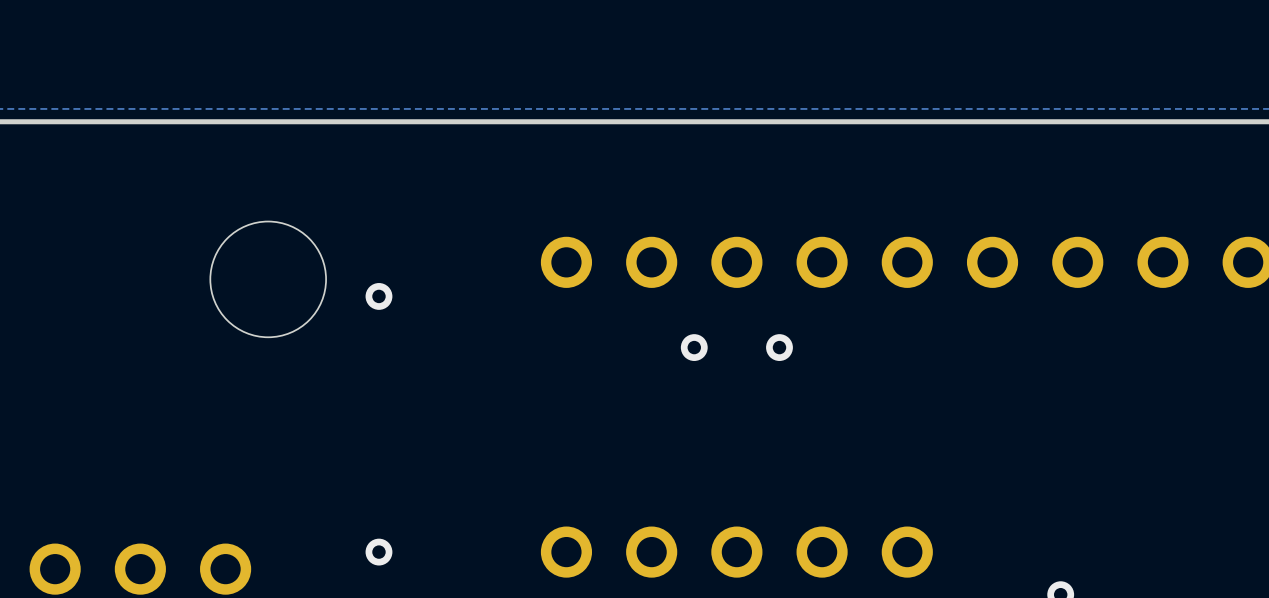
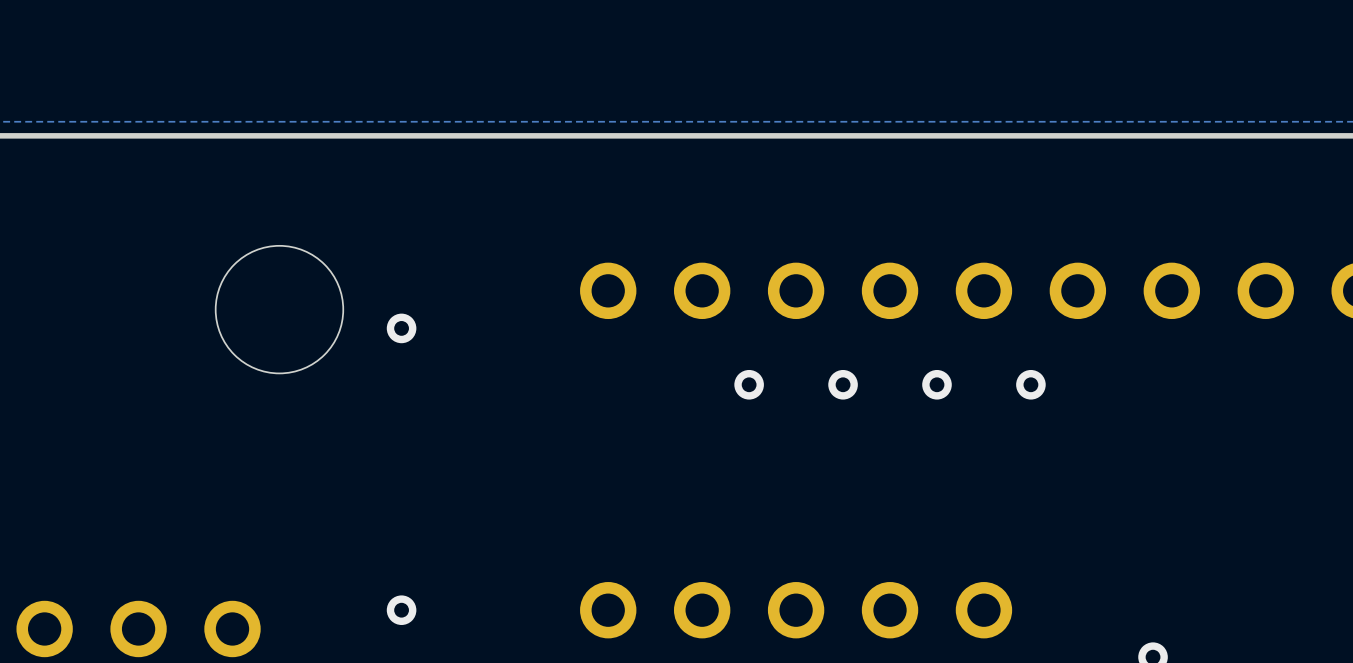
via: none -> (936, 384)
via: none -> (1030, 384)

